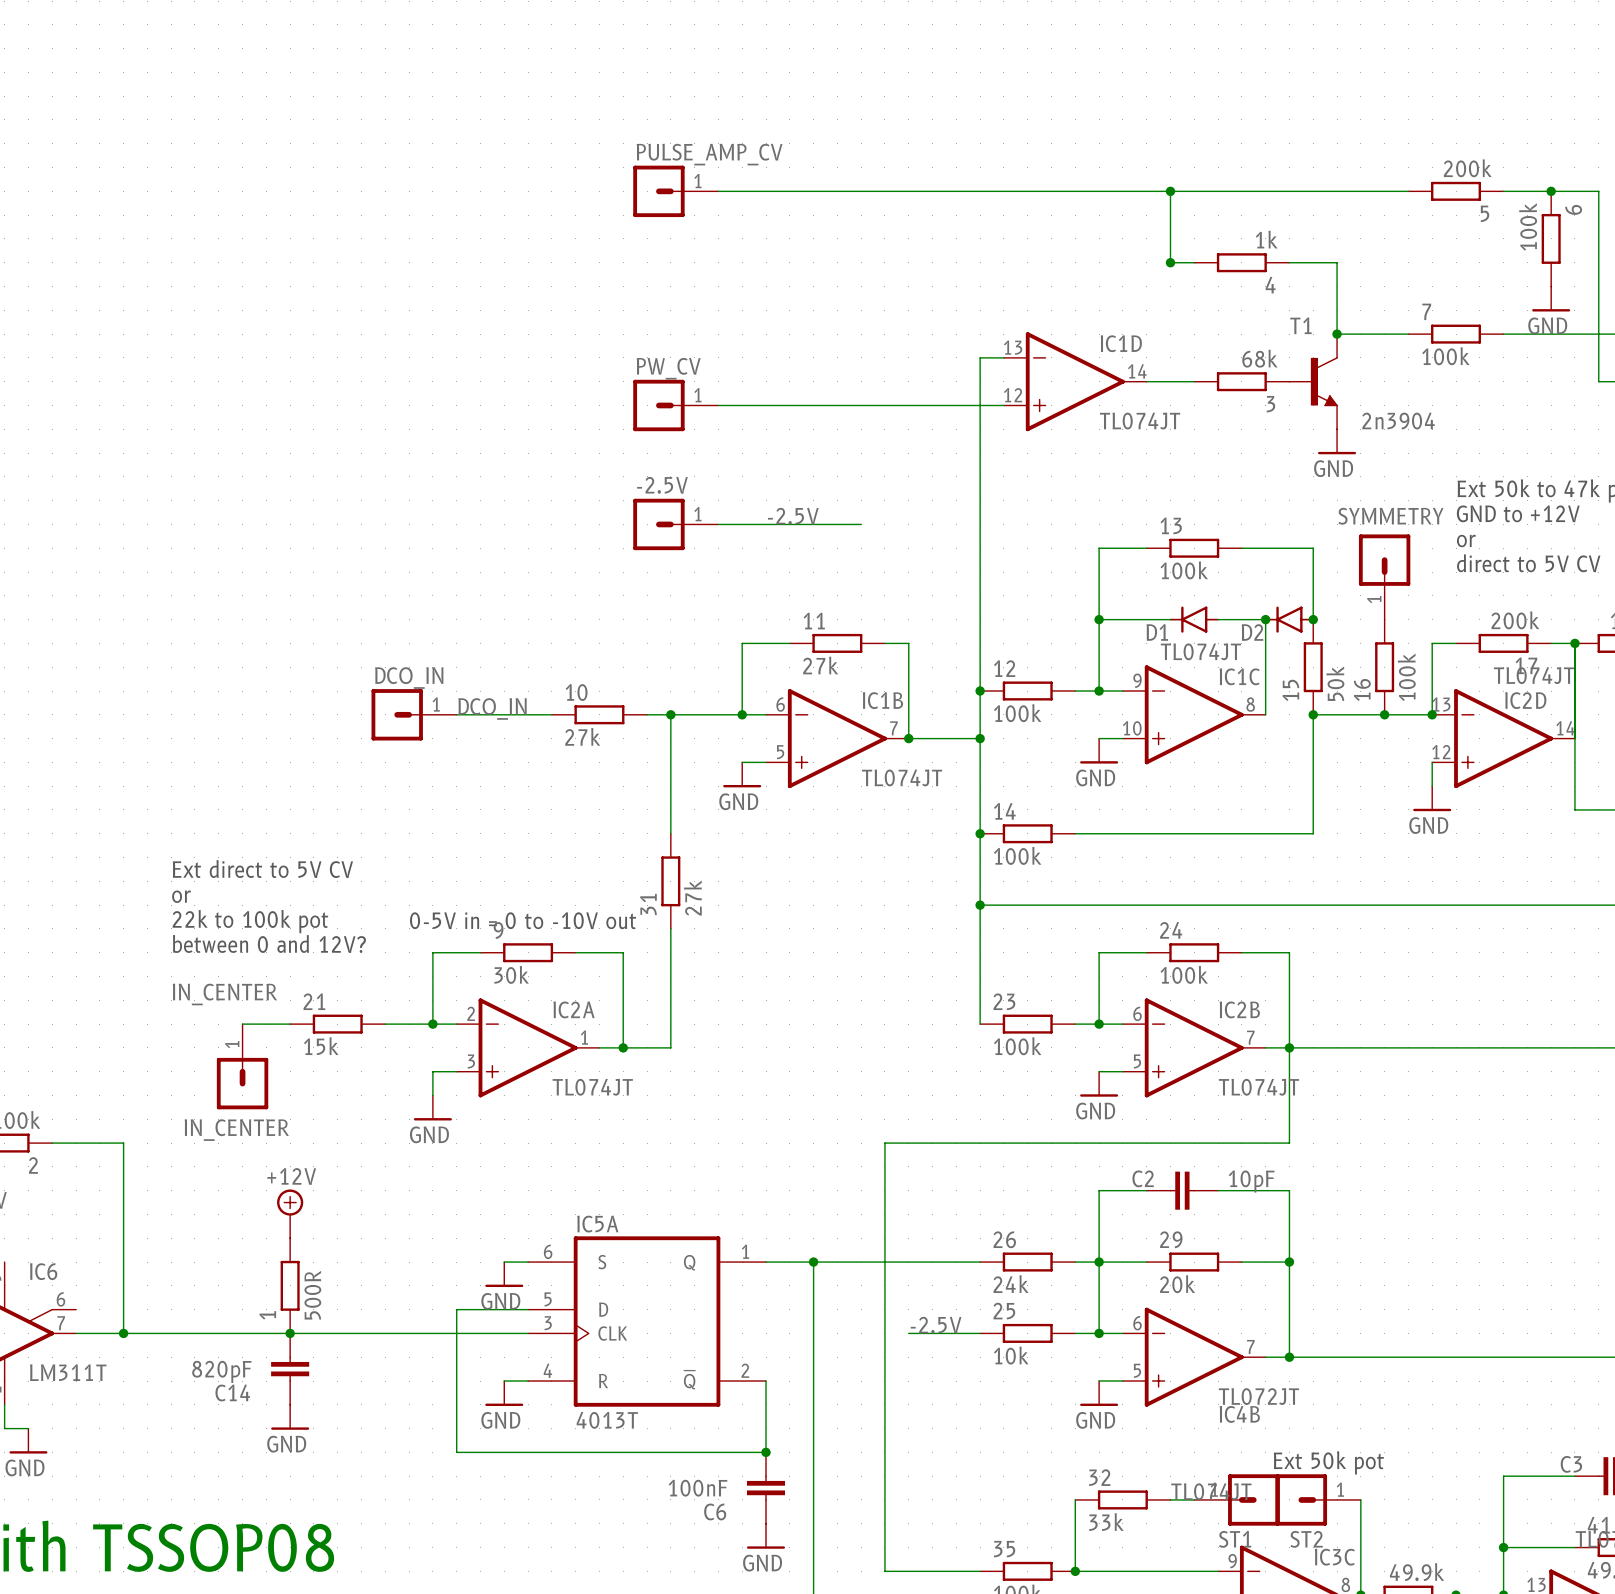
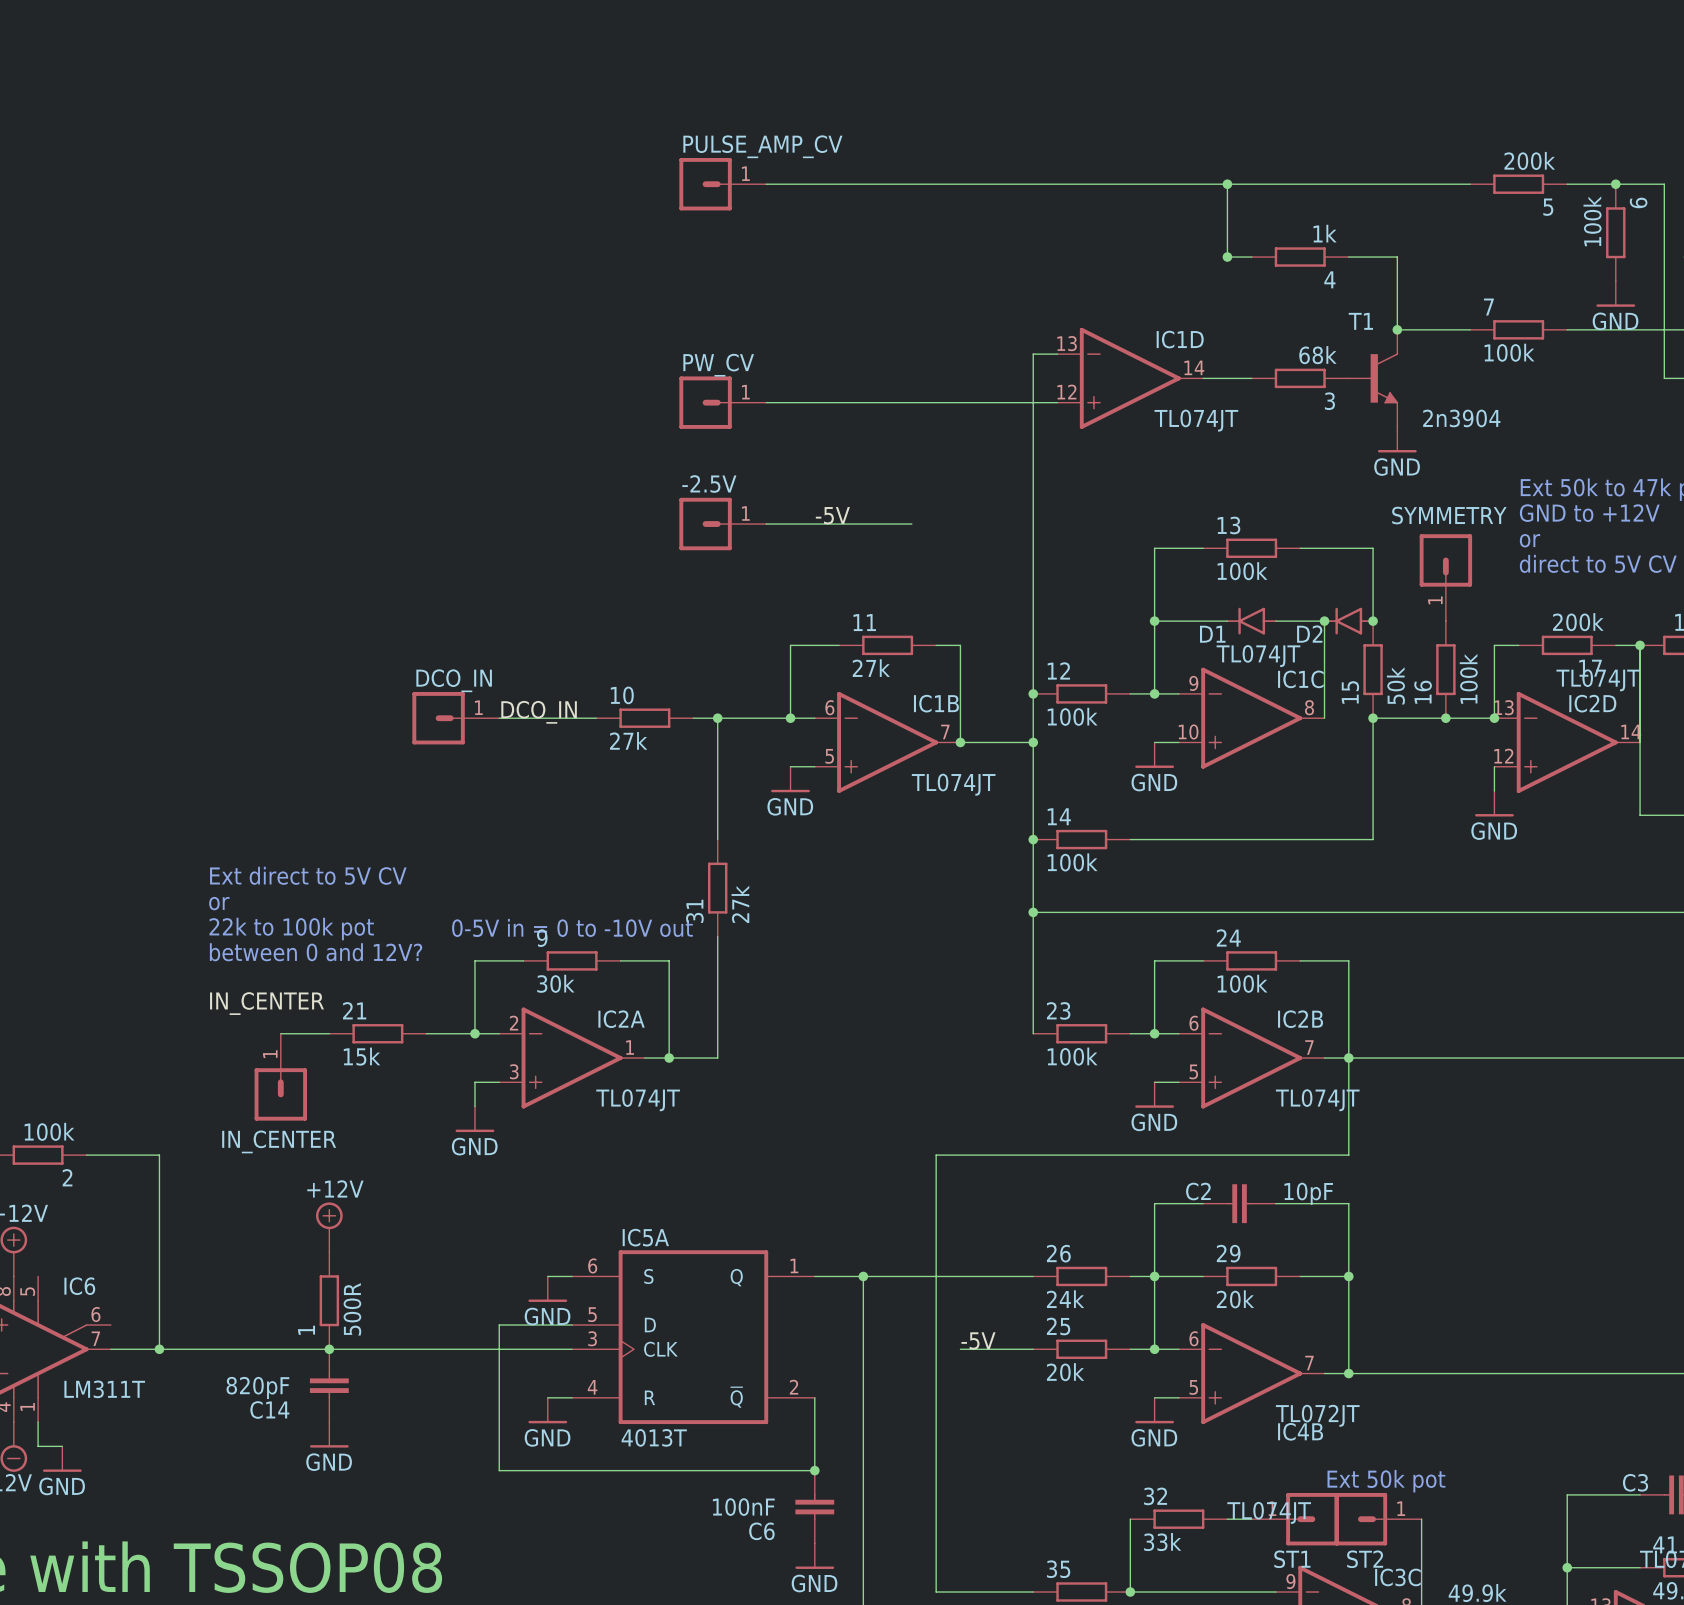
label: -2.5V (793, 516) -> -5V (832, 515)
label: -2.5V (936, 1325) -> -5V (978, 1340)
25 value: 10k (1011, 1355) -> 20k (1065, 1372)

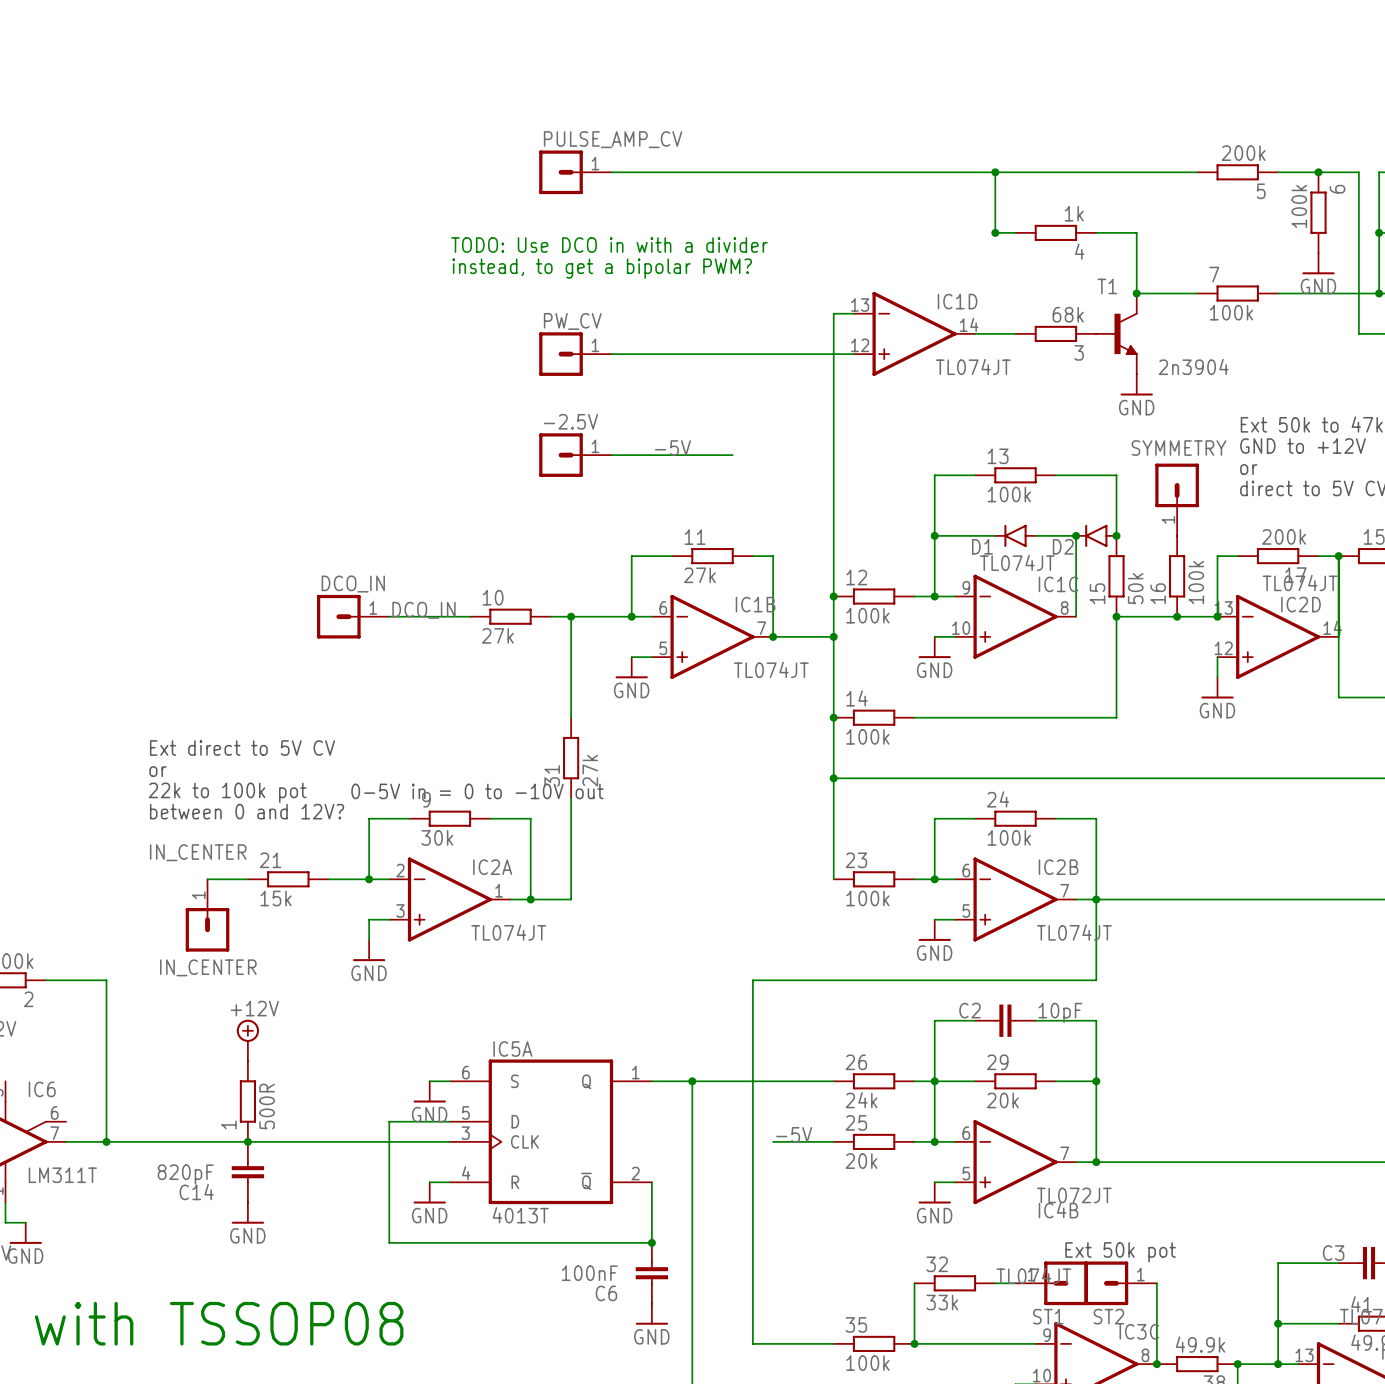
text: none -> TODO: Use DCO in with a divider (609, 245)
text: none -> instead, to get a bipolar PWM? (602, 268)

